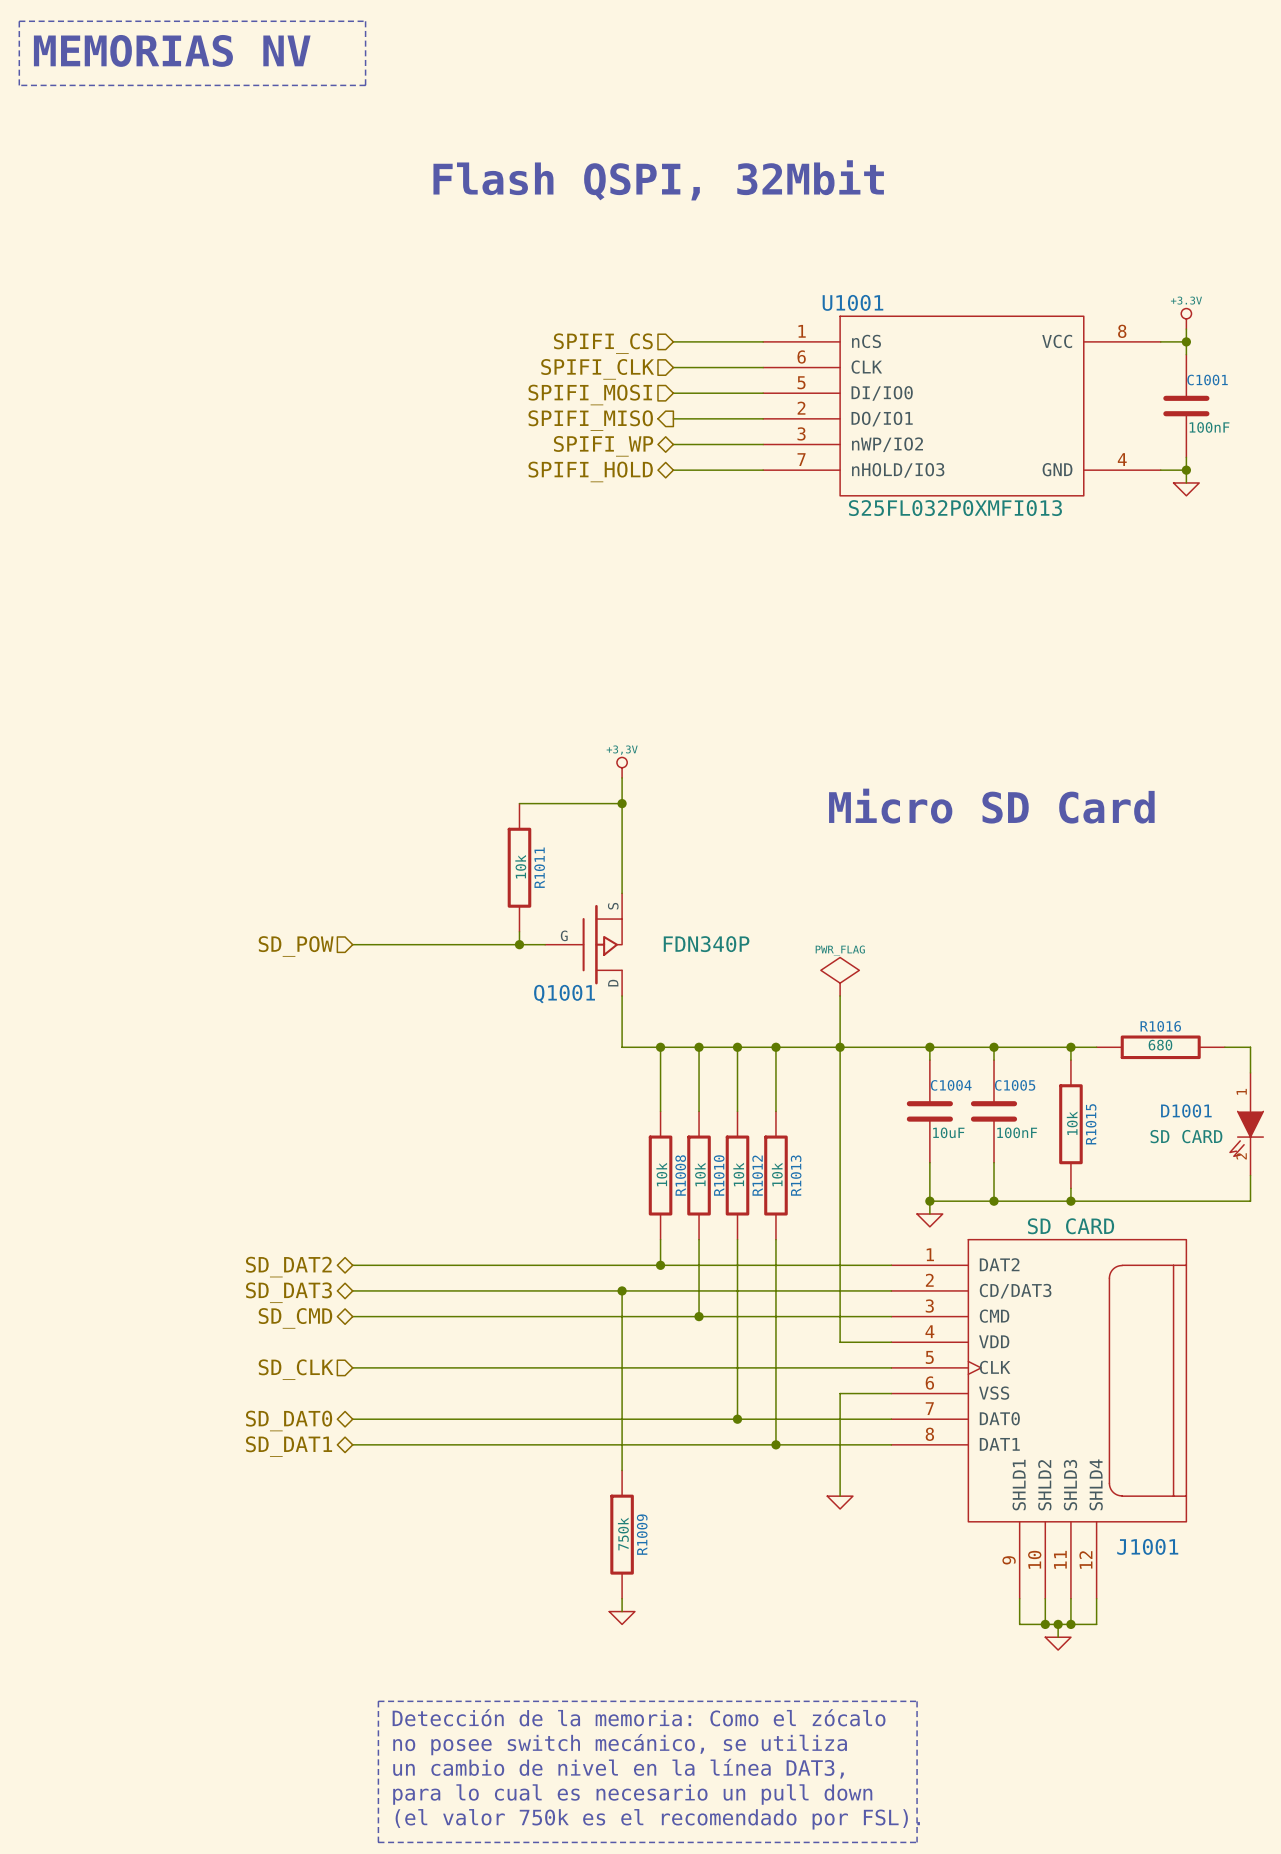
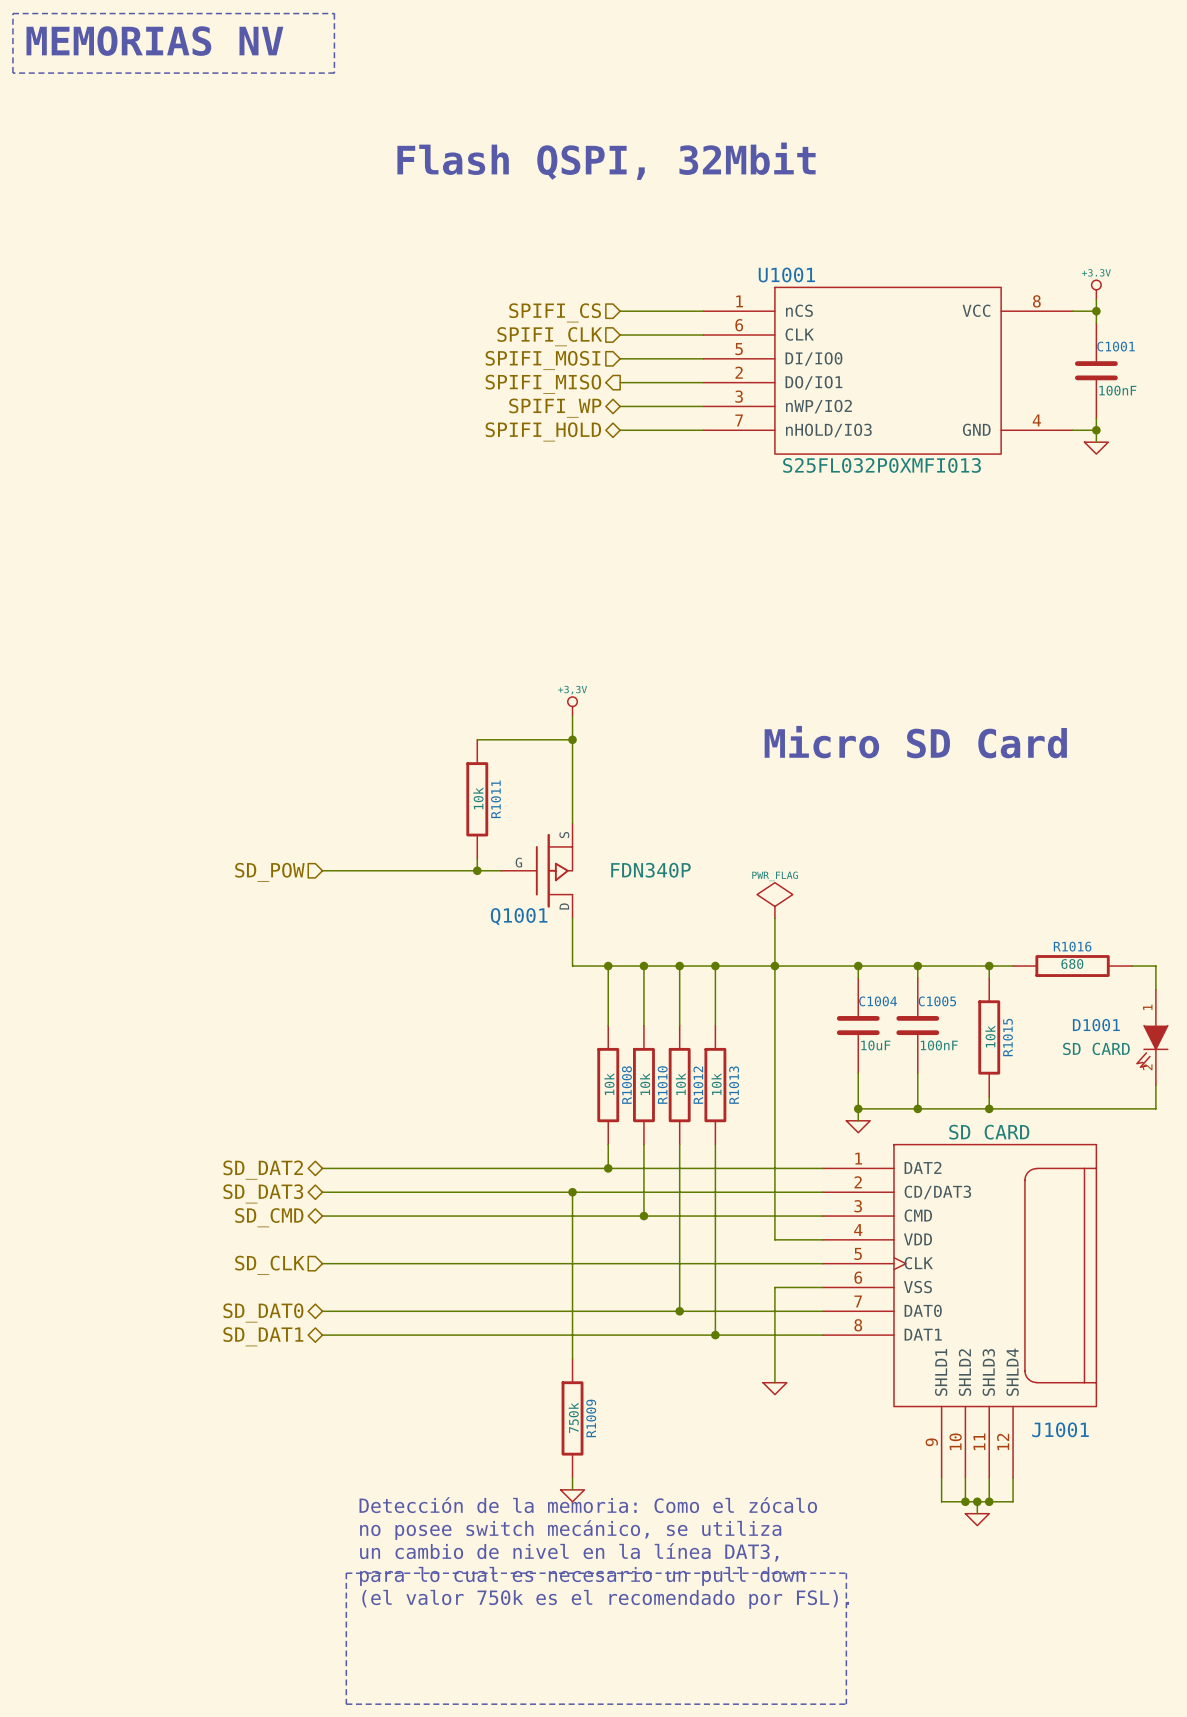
text position: Detección de la memoria: Como el zócalo (639, 1717) -> Detección de la memoria: Como el zócalo (588, 1505)
text position: no posee switch mecánico, se utiliza (620, 1744) -> no posee switch mecánico, se utiliza (570, 1530)
text position: un cambio de nivel en la línea DAT3, (618, 1768) -> un cambio de nivel en la línea DAT3, (569, 1552)
text position: para lo cual es necesario un pull down (632, 1794) -> para lo cual es necesario un pull down (582, 1576)
text position: (el valor 750k es el recomendado por FSL). (657, 1819) -> (el valor 750k es el recomendado por FSL). (605, 1599)

